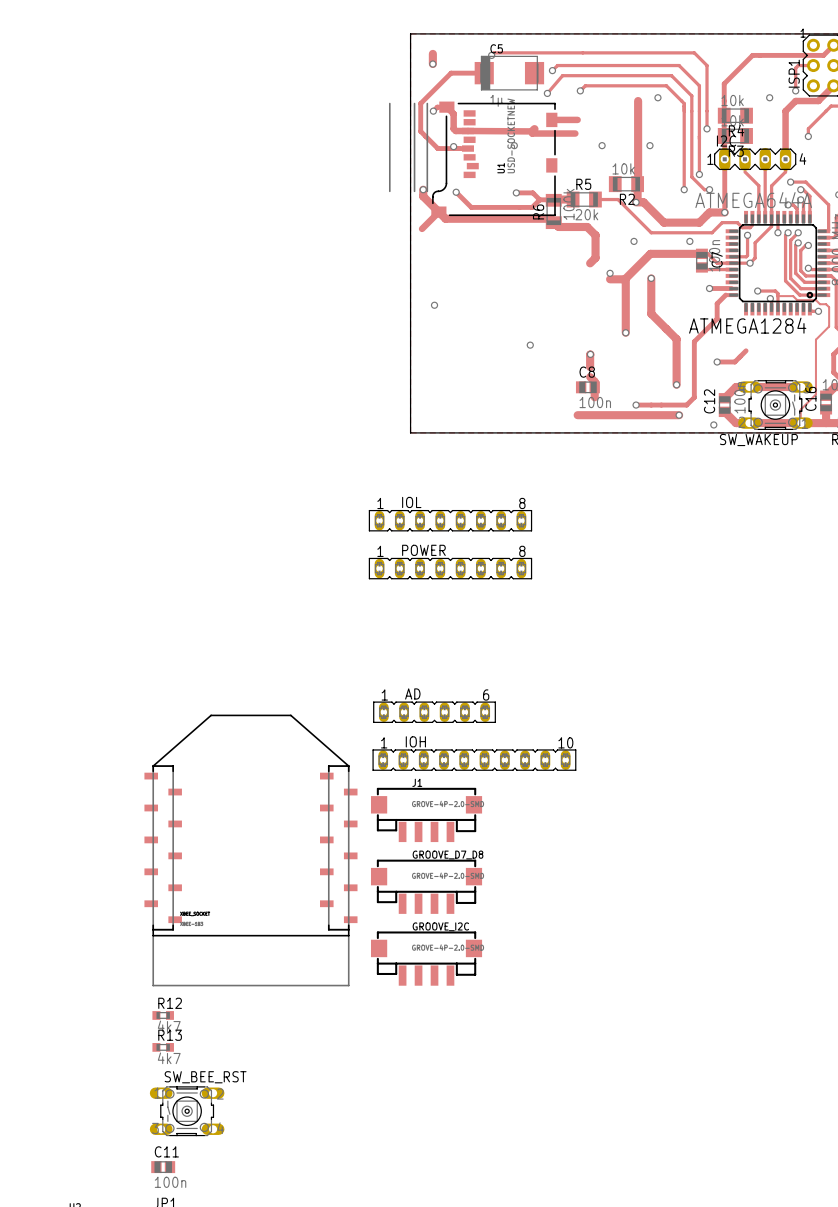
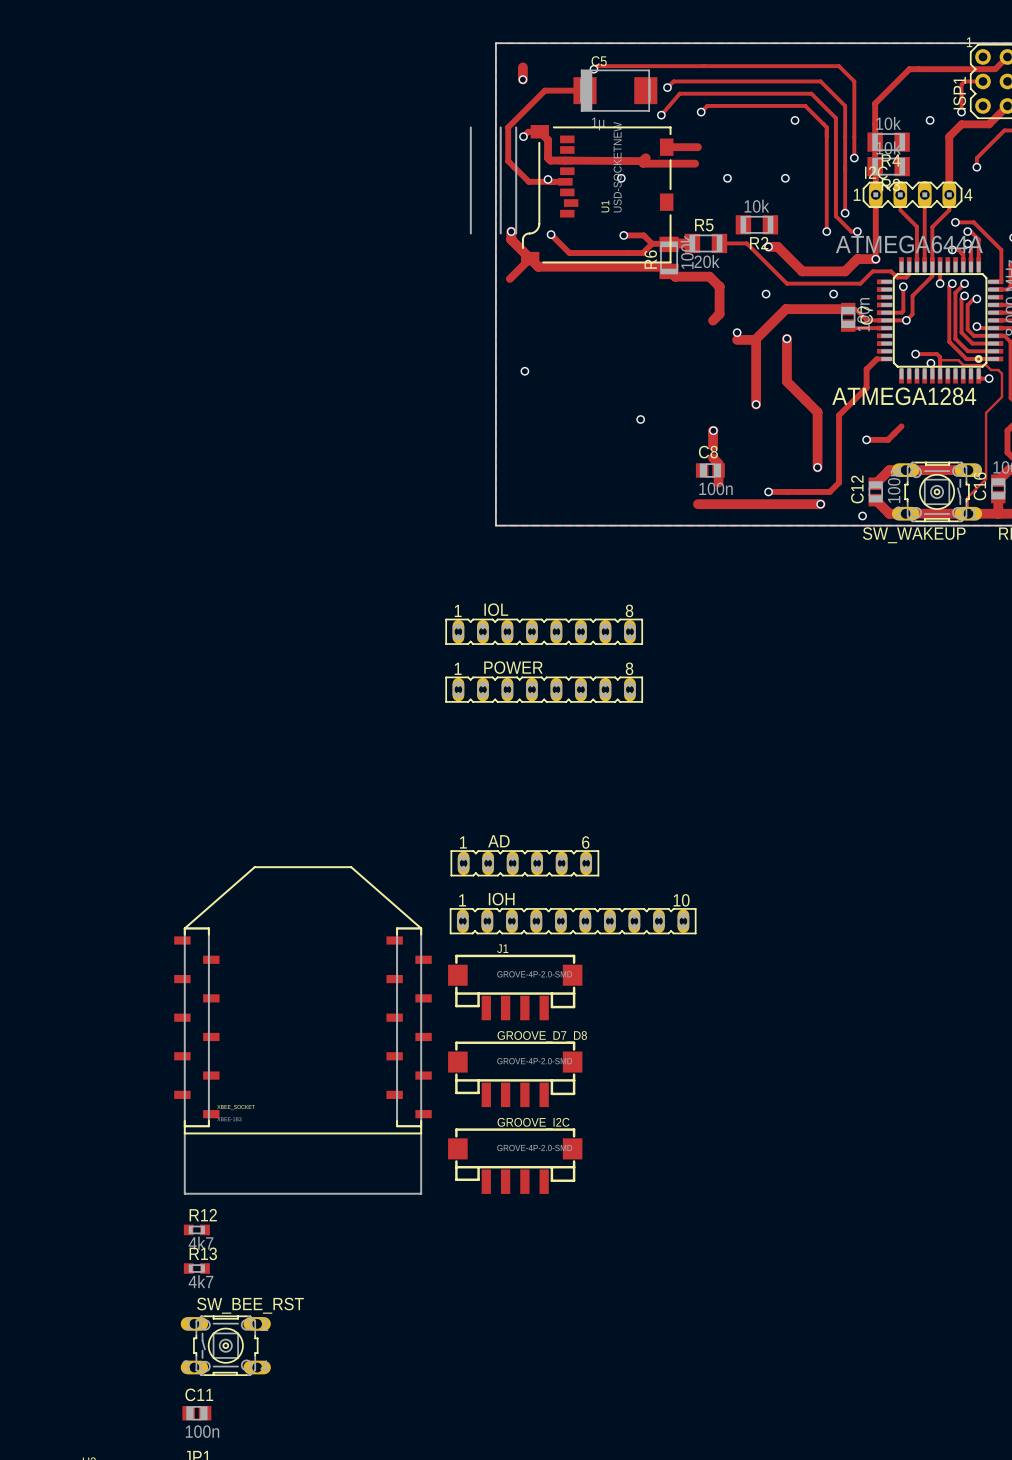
track: (638, 101) (637, 200) -> none
track: (709, 288) (731, 288) -> none
via: (709, 288) -> none

